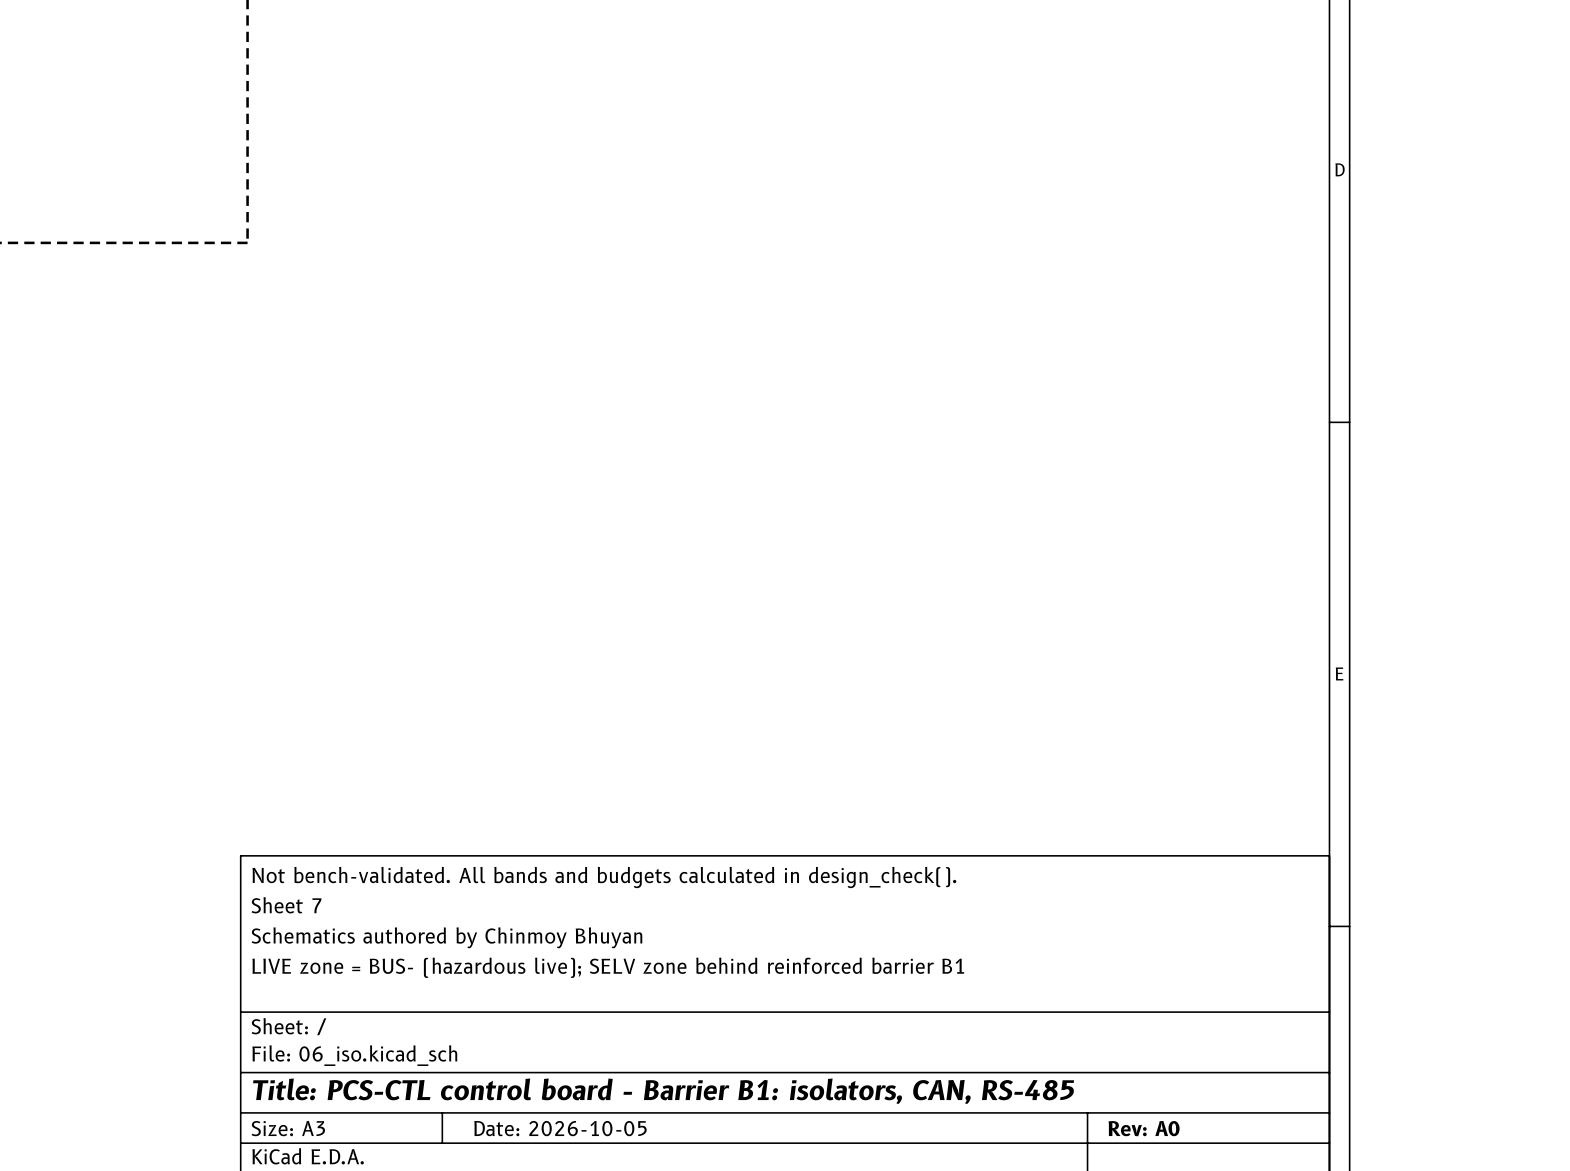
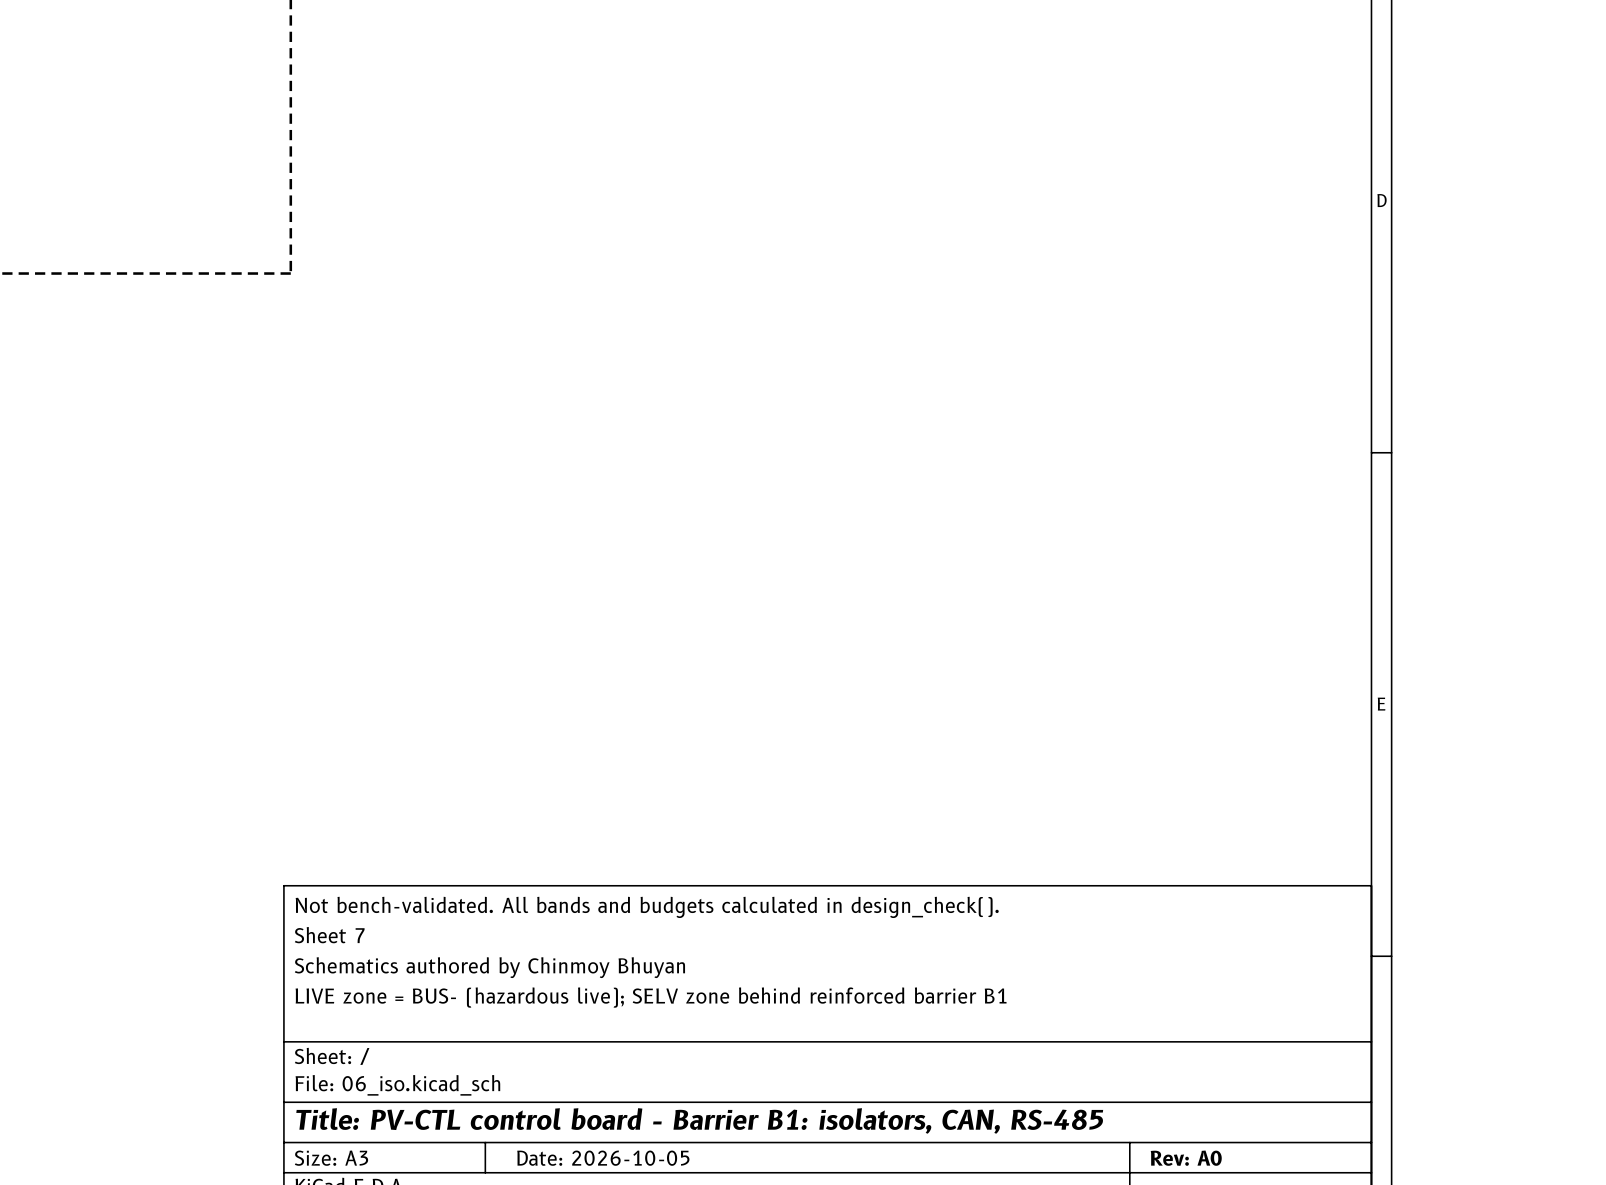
title block: Title: PCS-CTL control board - Barrier B1: isolators, CAN, RS-485 (663, 1091) -> Title: PV-CTL control board - Barrier B1: isolators, CAN, RS-485 (699, 1120)

